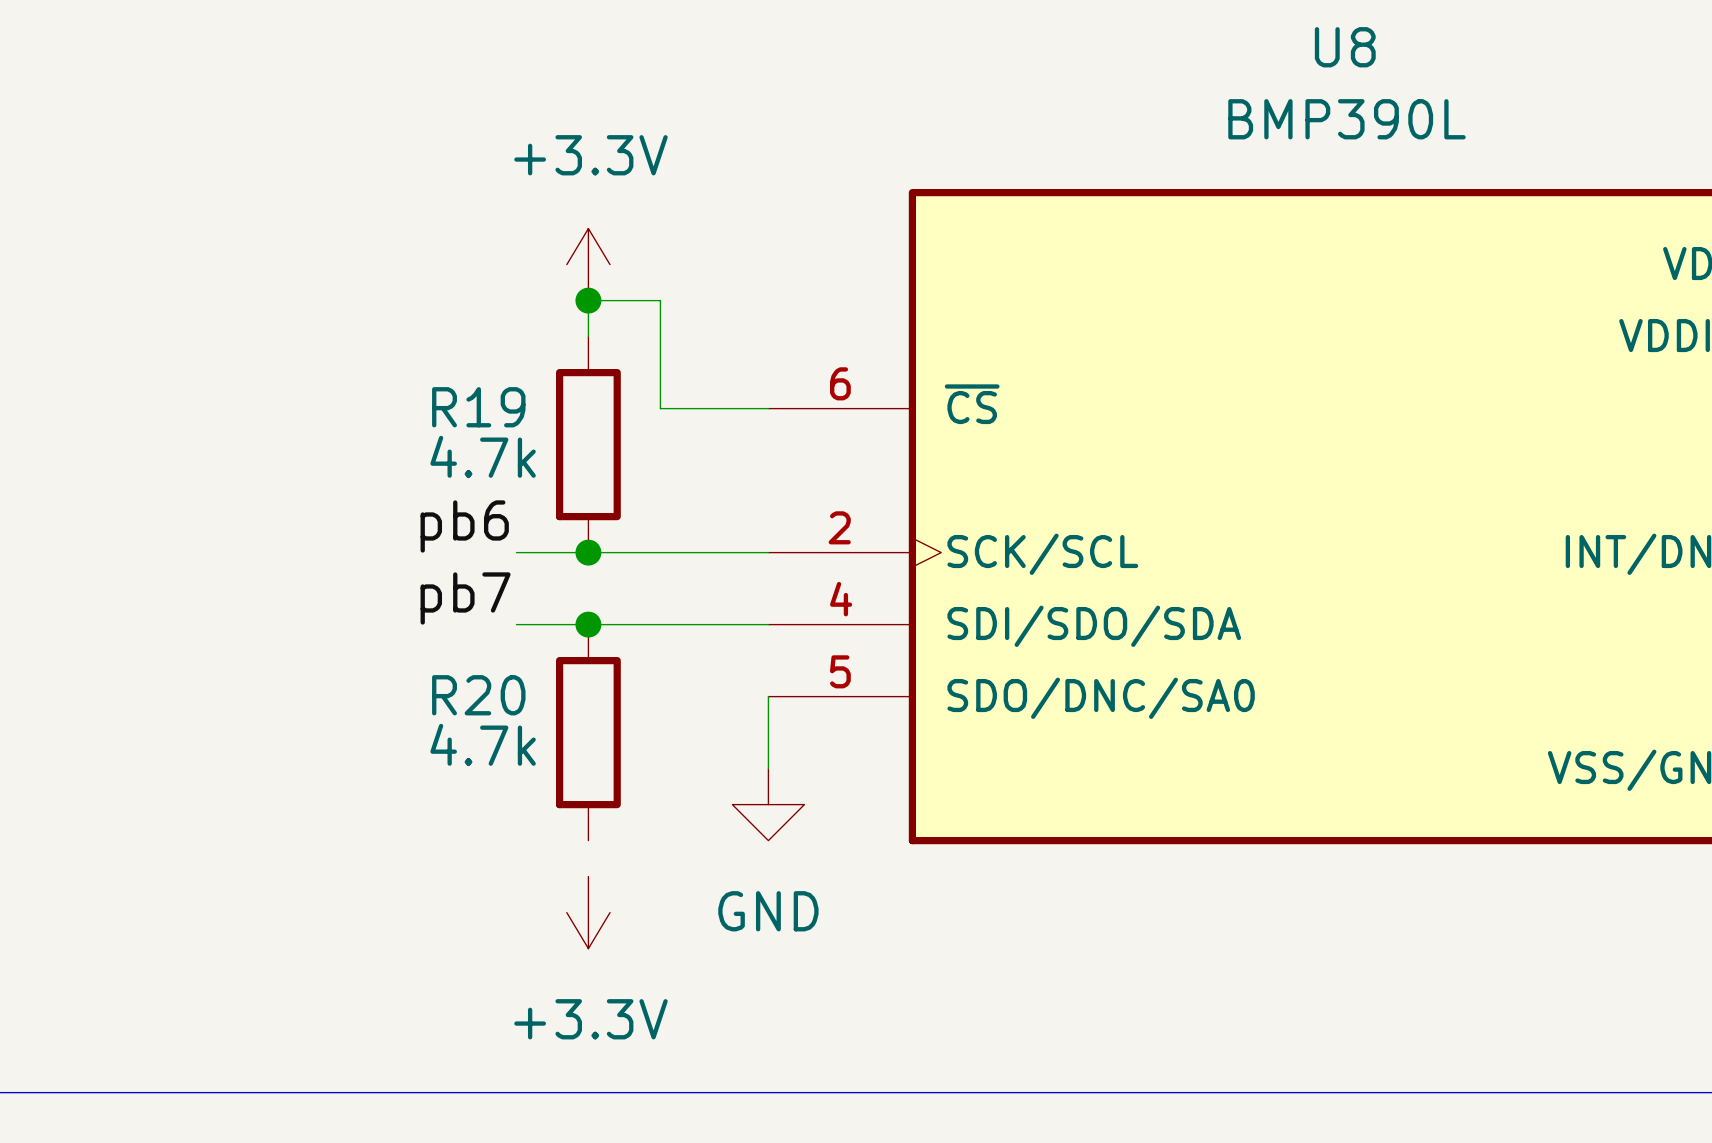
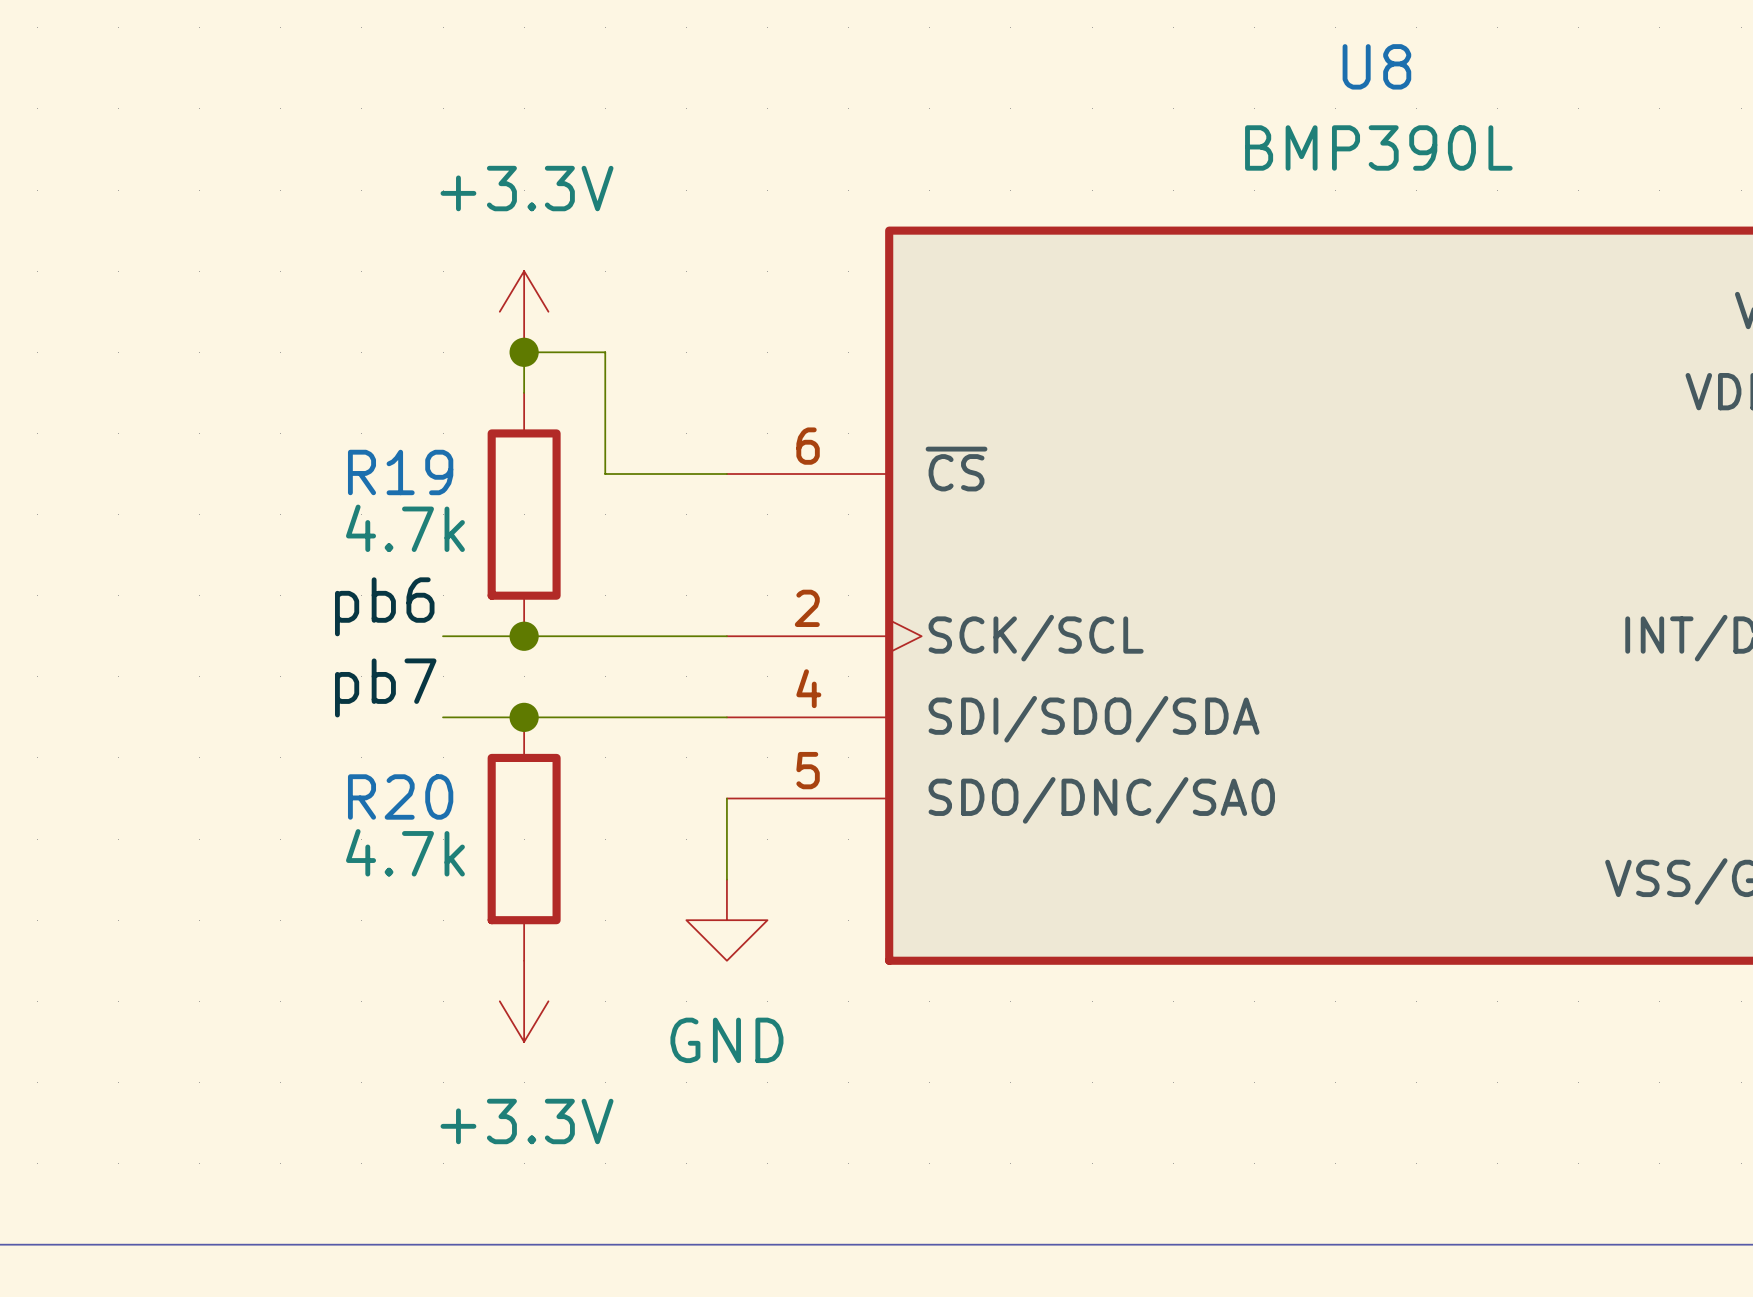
power symbol position: +3.3V (588, 912) -> +3.3V (524, 1001)

